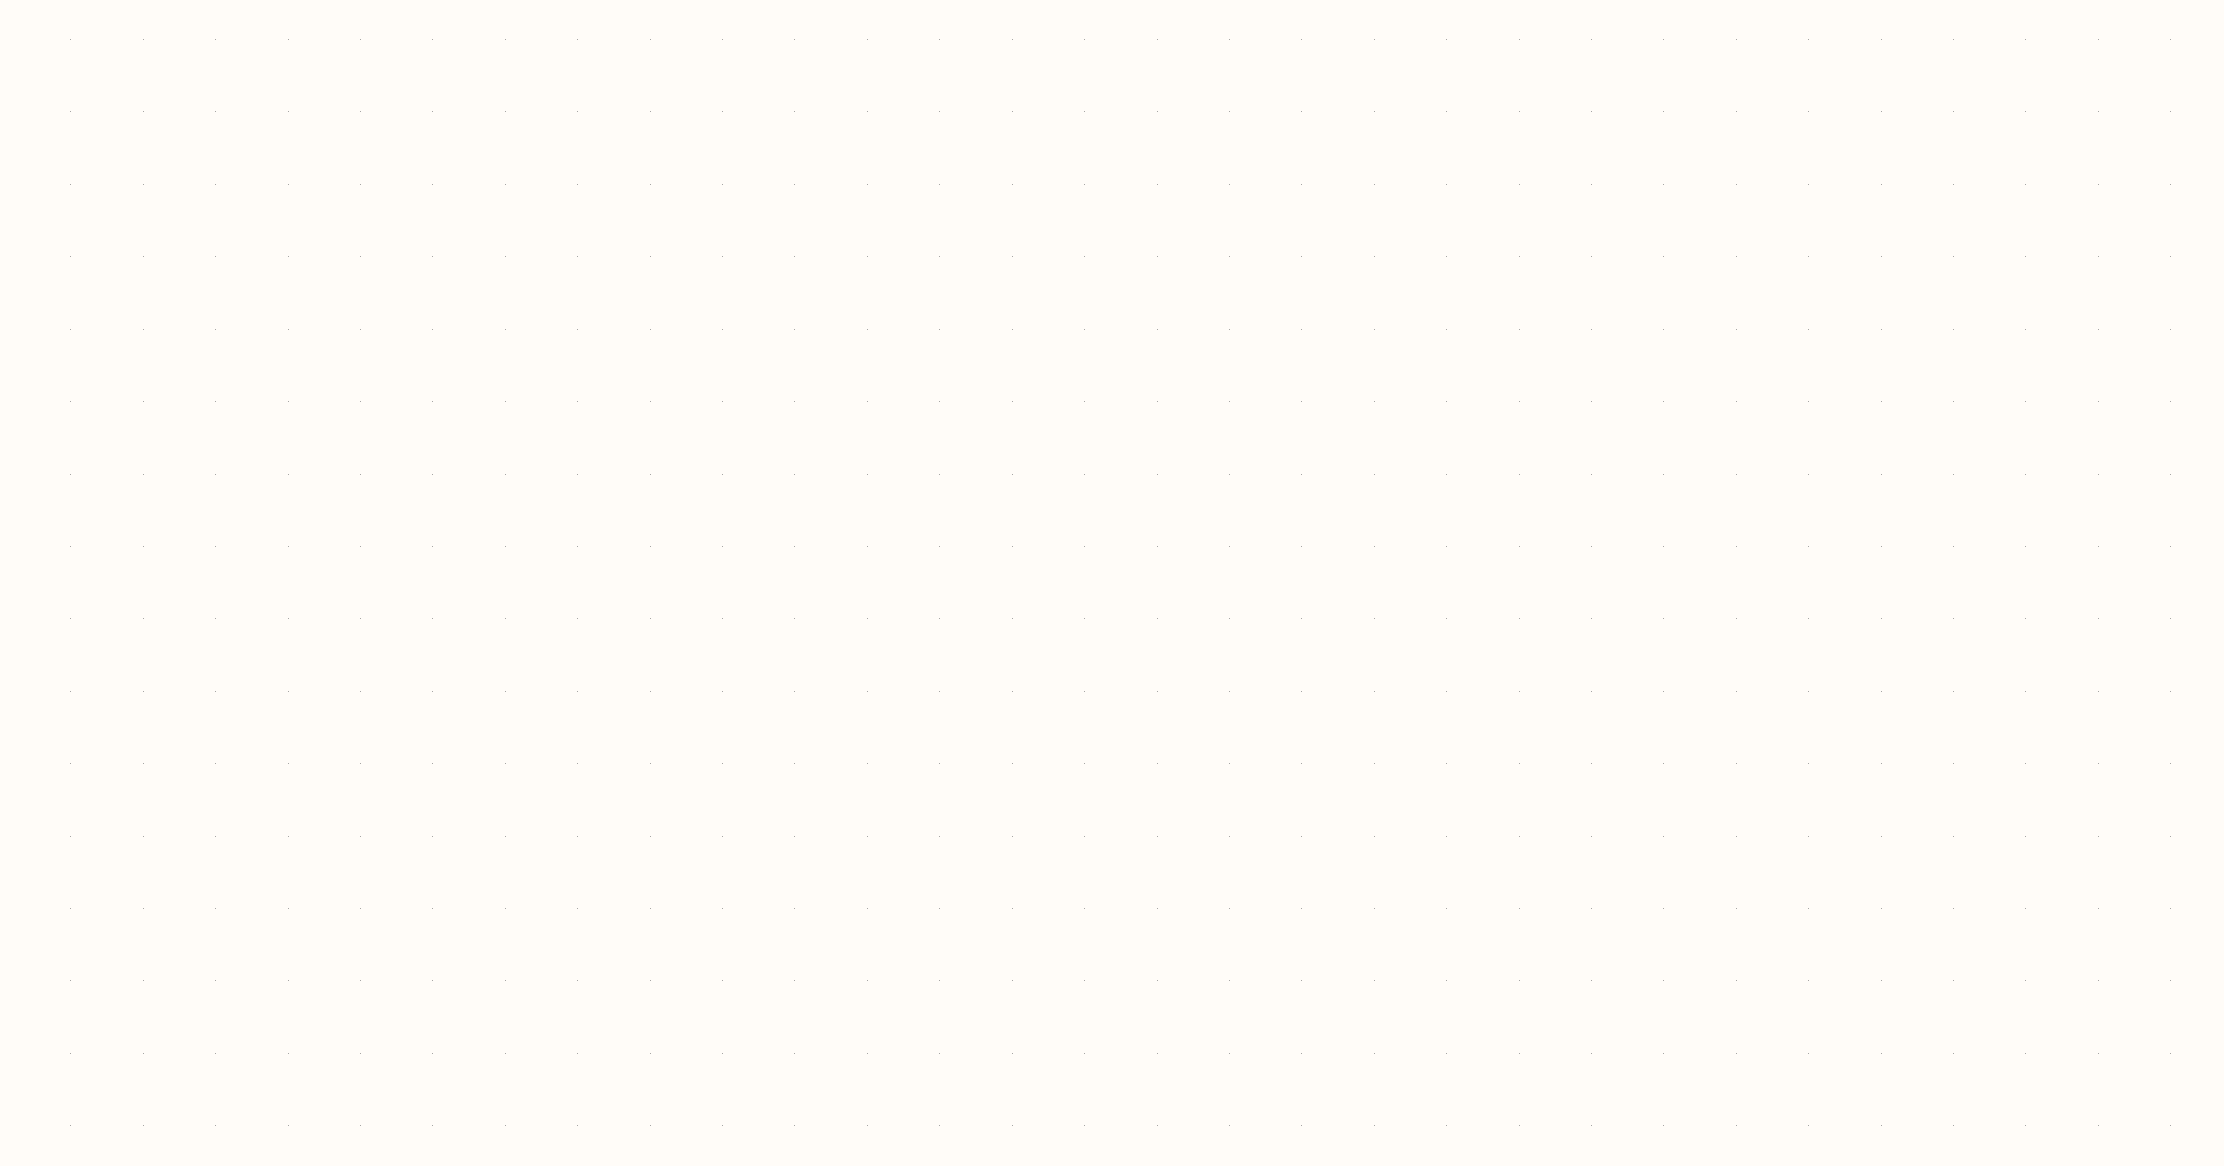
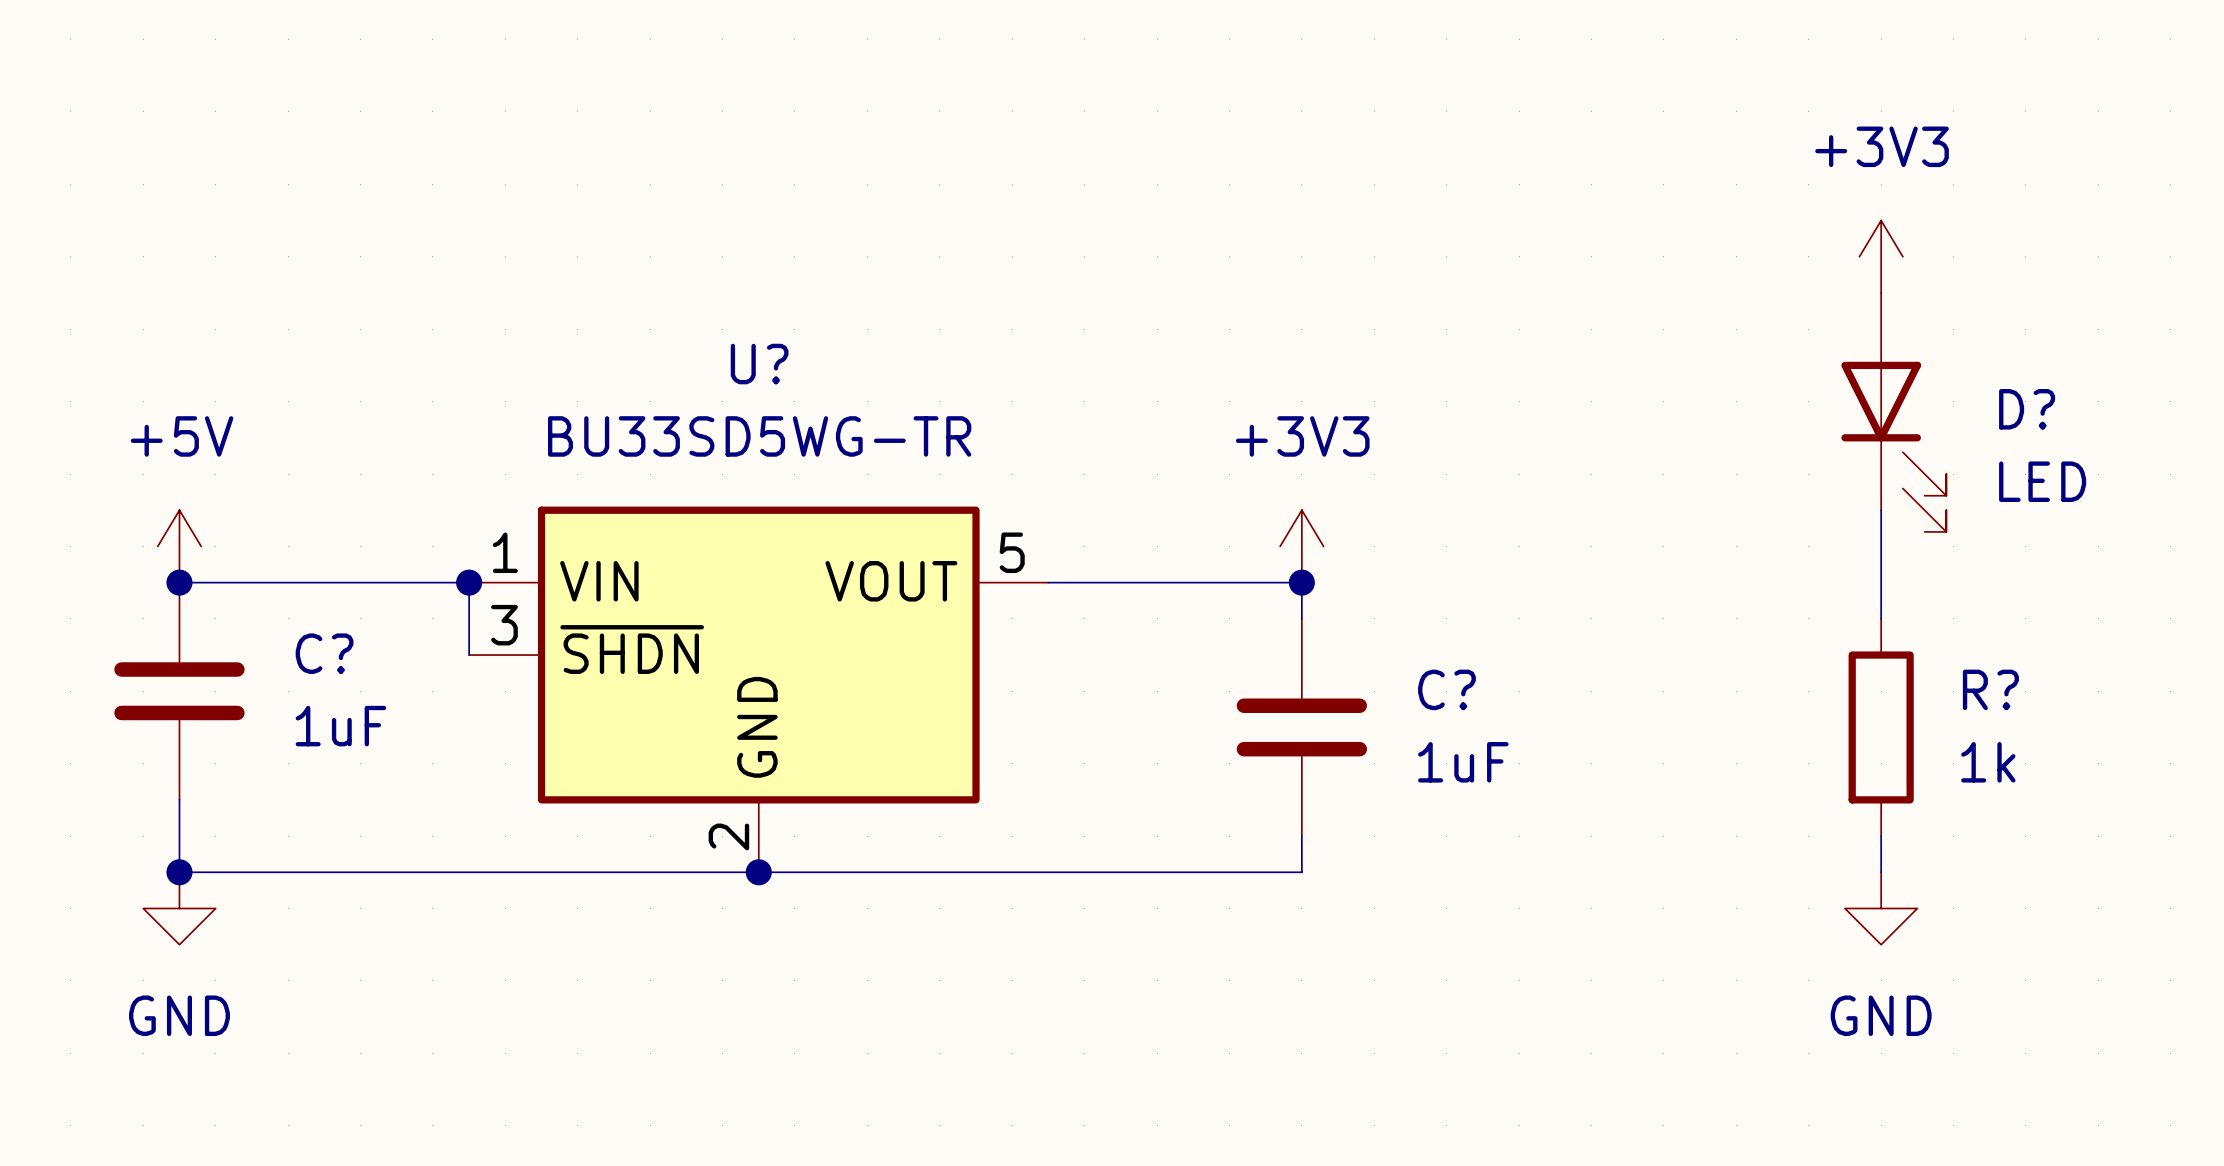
power symbol: none -> +3V3 (1881, 256)
D?: none -> LED (1893, 412)
wire: none -> (1881, 510) (1881, 618)
power symbol: none -> +5V (179, 546)
power symbol: none -> +3V3 (1301, 546)
wire: none -> (179, 582) (469, 582) (469, 655)
junction: none -> (179, 582)
junction: none -> (469, 582)
wire: none -> (1048, 582) (1301, 582) (1301, 618)
junction: none -> (1301, 582)
U?: none -> BU33SD5WG-TR (758, 689)
C?: none -> 1uF (179, 691)
C?: none -> 1uF (1301, 727)
R?: none -> 1k (1881, 727)
wire: none -> (179, 799) (179, 872) (1301, 872) (1301, 836)
wire: none -> (1881, 836) (1881, 872)
junction: none -> (179, 872)
junction: none -> (758, 872)
power symbol: none -> GND (179, 908)
power symbol: none -> GND (1881, 908)

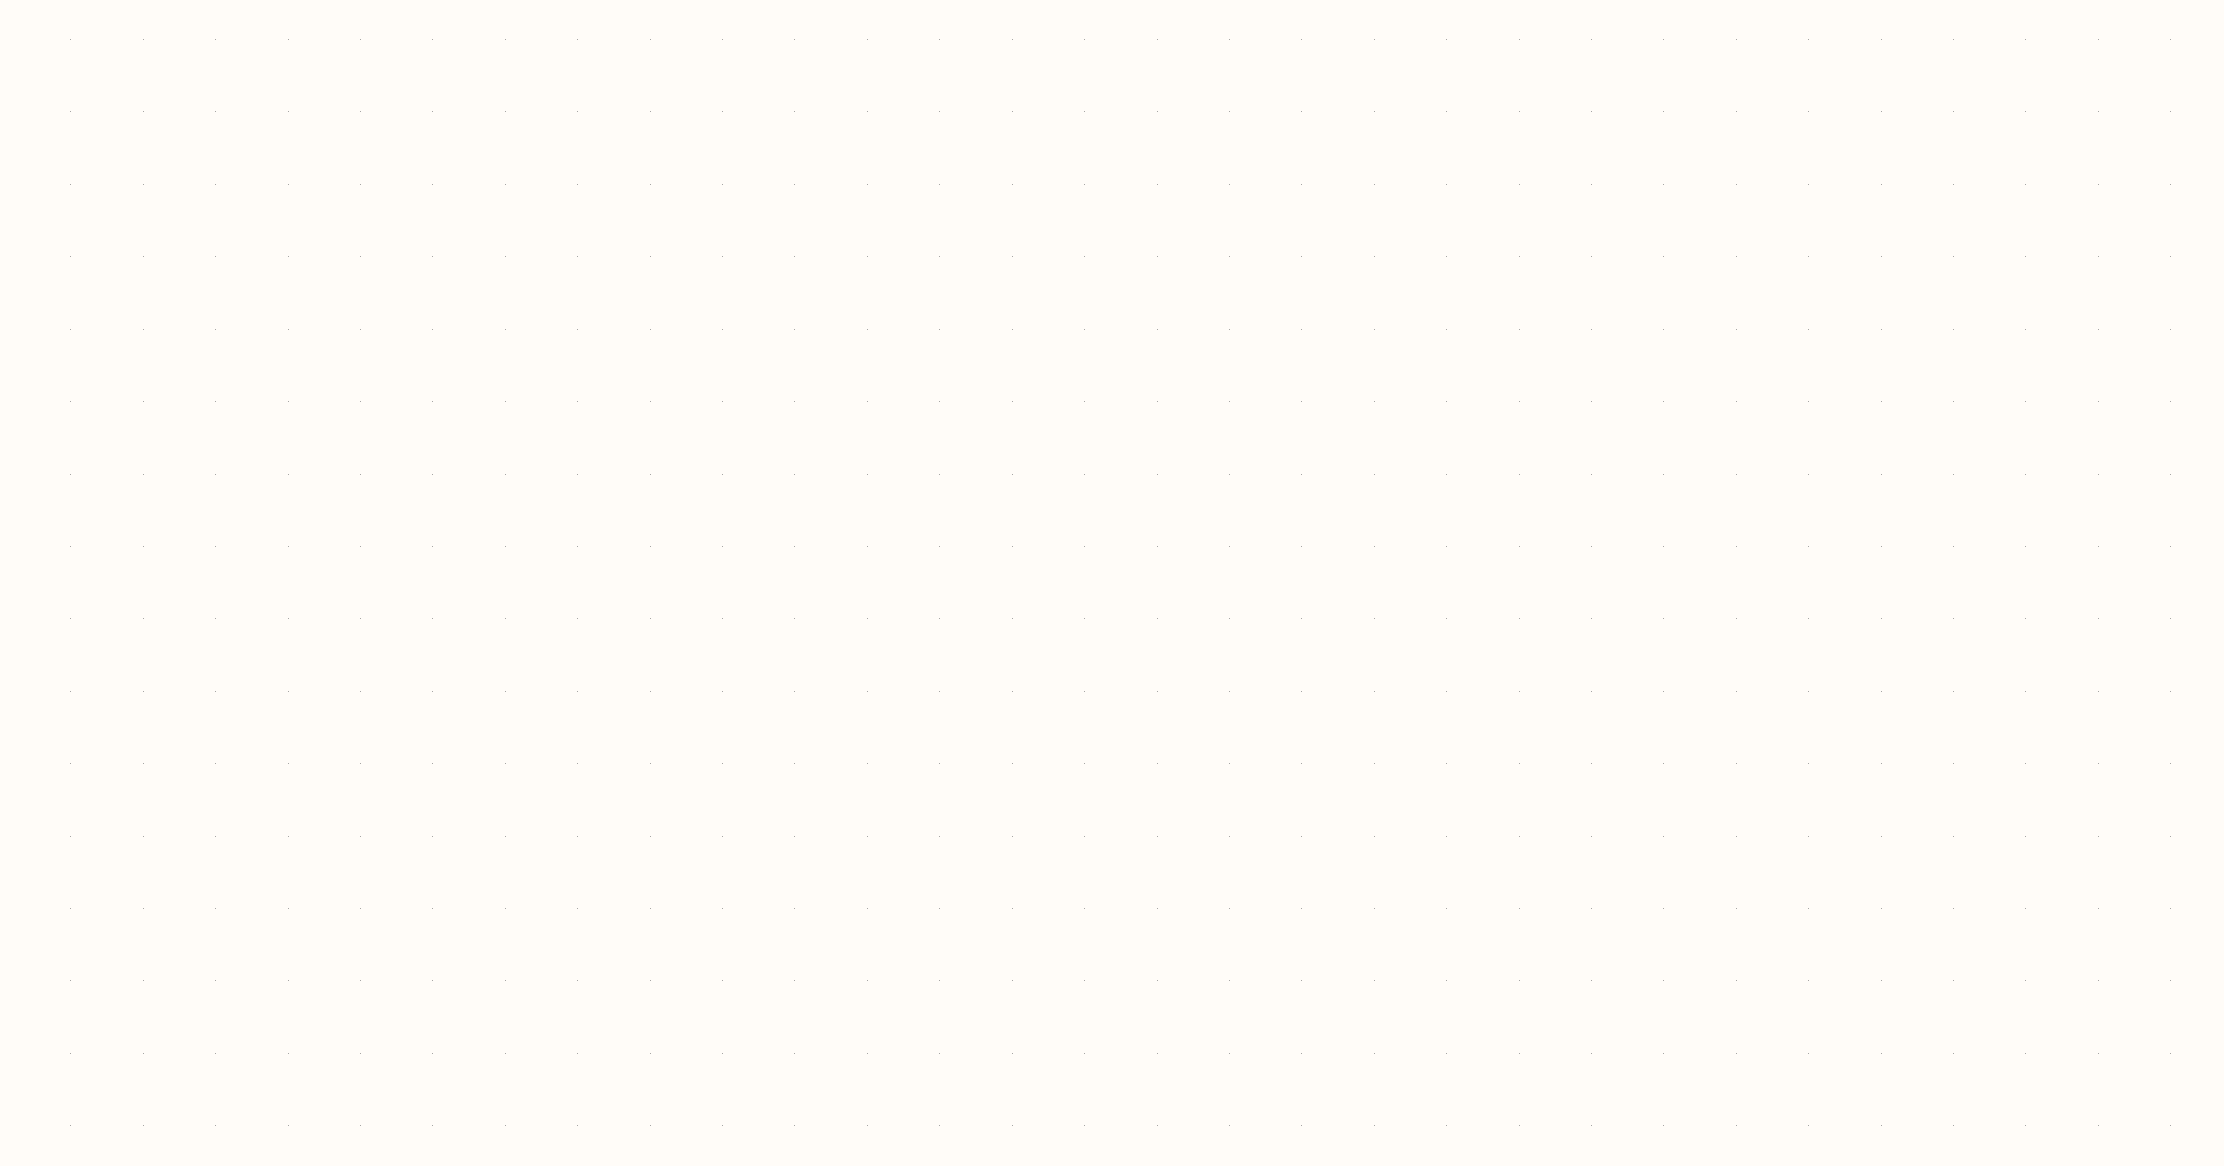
power symbol: +3V3 (1881, 256) -> none
D?: LED (1893, 412) -> none
wire: (1881, 510) (1881, 618) -> none
power symbol: +5V (179, 546) -> none
power symbol: +3V3 (1301, 546) -> none
wire: (179, 582) (469, 582) (469, 655) -> none
junction: (179, 582) -> none
junction: (469, 582) -> none
wire: (1048, 582) (1301, 582) (1301, 618) -> none
junction: (1301, 582) -> none
U?: BU33SD5WG-TR (758, 689) -> none
C?: 1uF (179, 691) -> none
C?: 1uF (1301, 727) -> none
R?: 1k (1881, 727) -> none
wire: (179, 799) (179, 872) (1301, 872) (1301, 836) -> none
wire: (1881, 836) (1881, 872) -> none
junction: (179, 872) -> none
junction: (758, 872) -> none
power symbol: GND (179, 908) -> none
power symbol: GND (1881, 908) -> none

